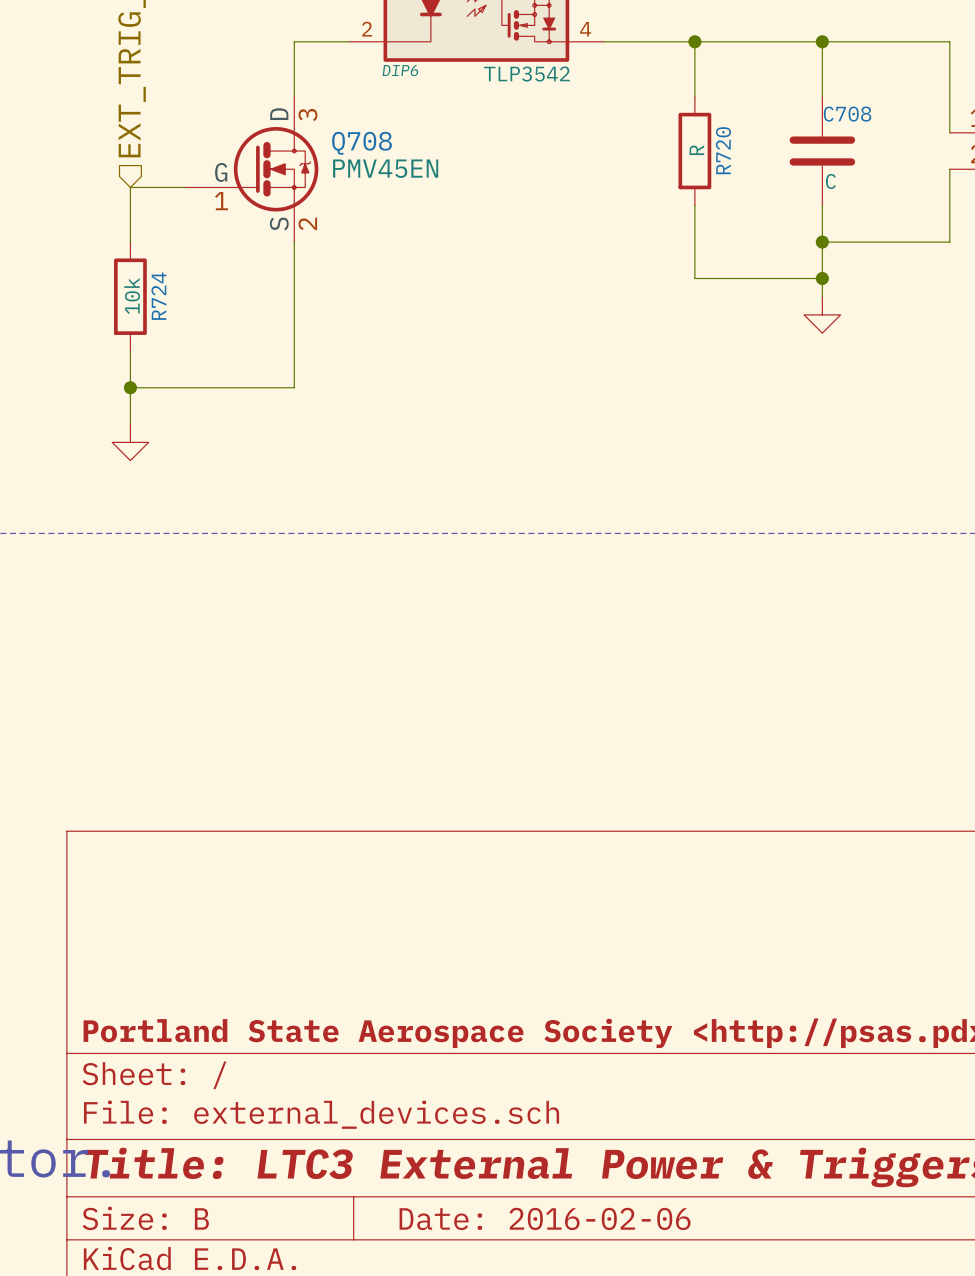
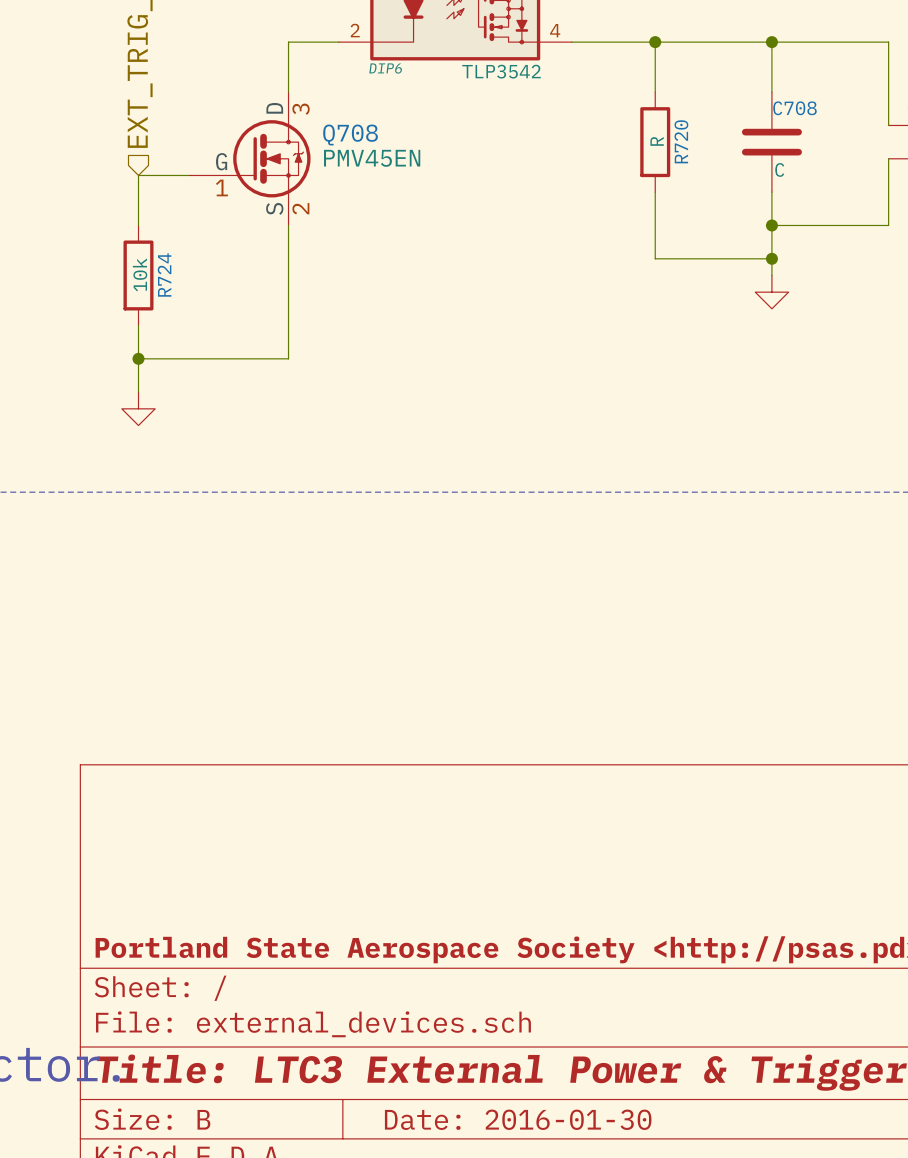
title block: Date: 2016-02-06 (545, 1218) -> Date: 2016-01-30 (518, 1119)

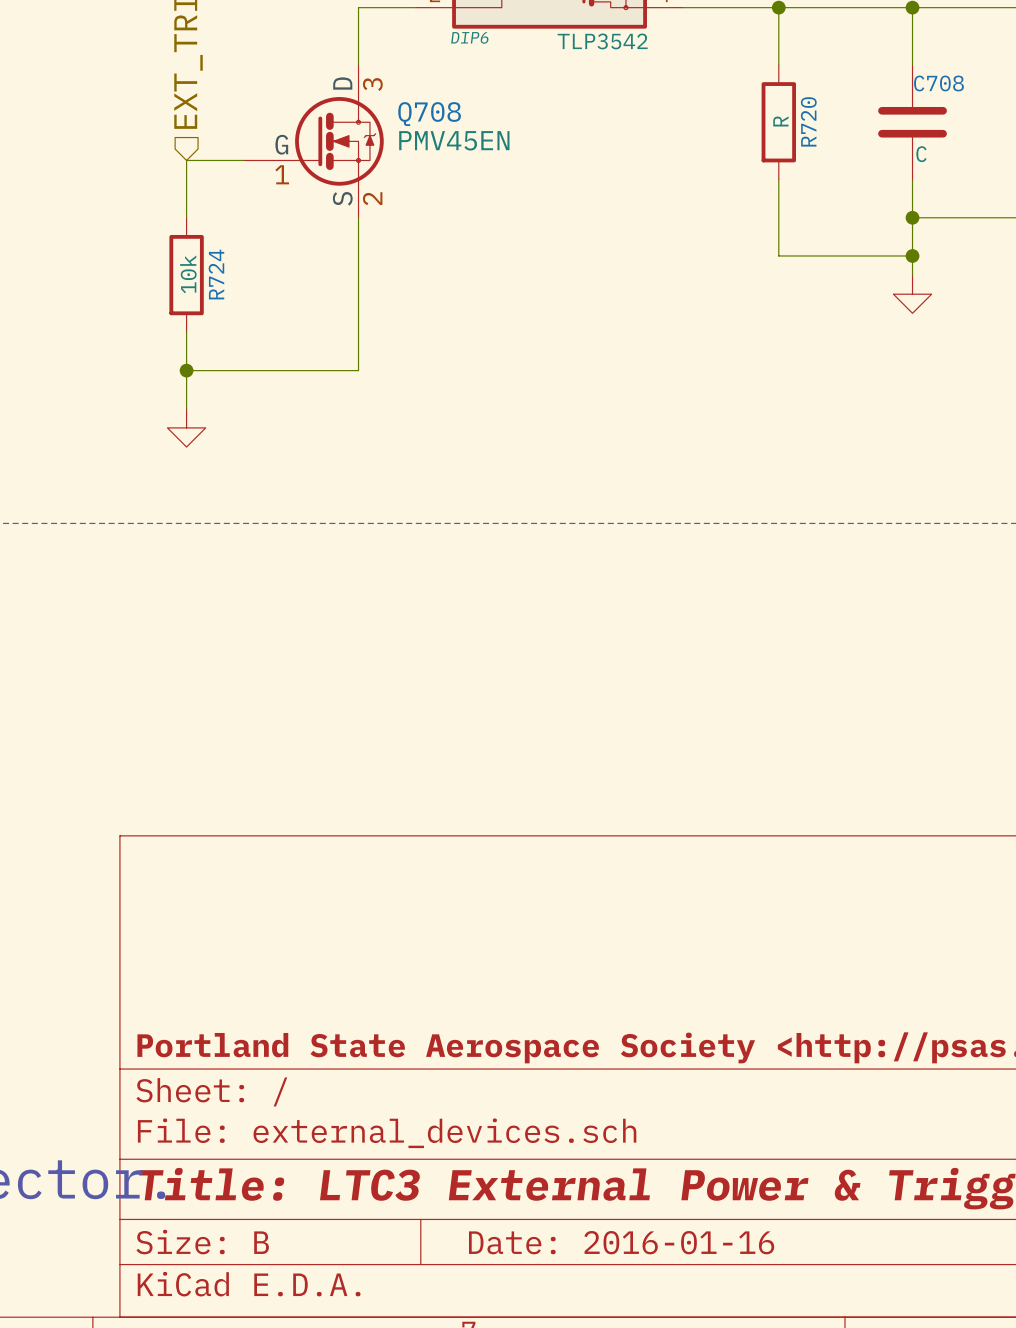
title block: Date: 2016-01-30 (518, 1119) -> Date: 2016-01-16 (621, 1242)

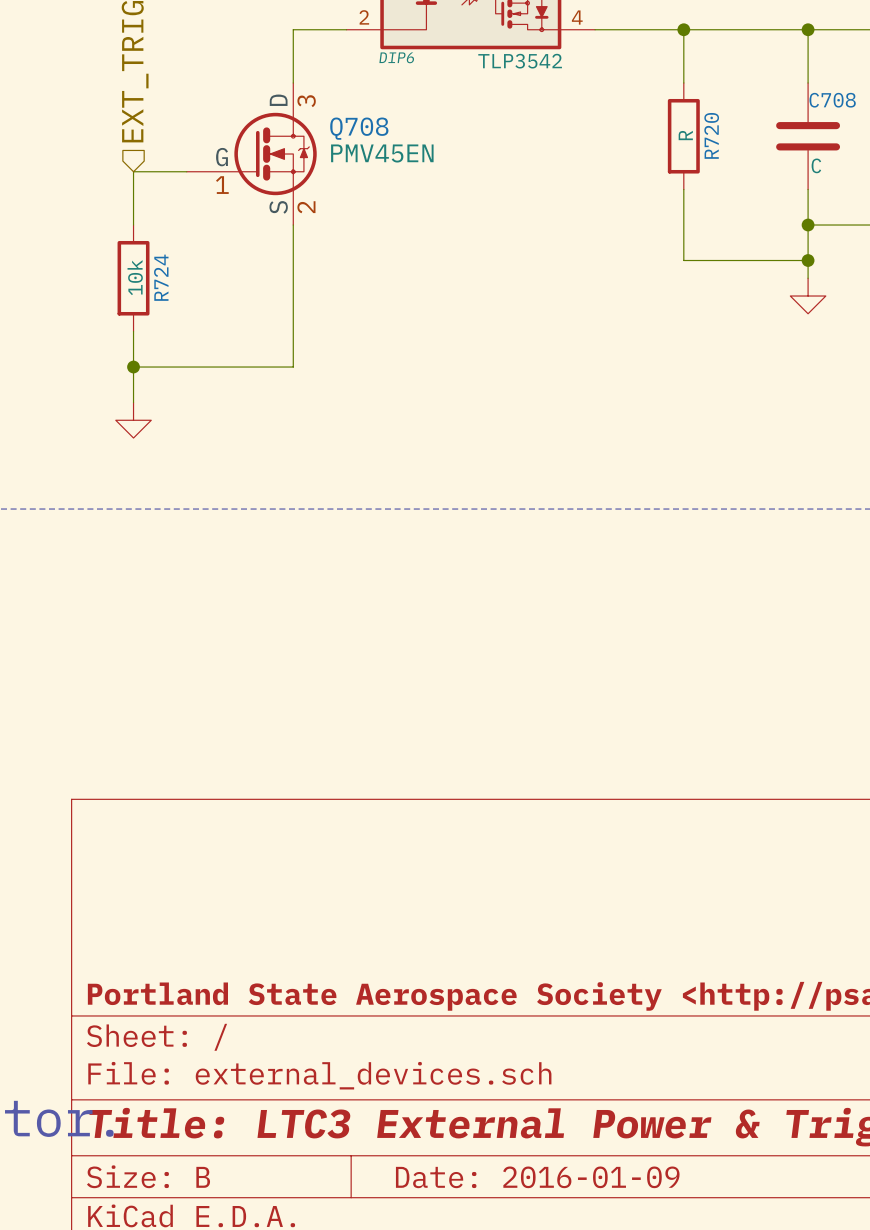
title block: Date: 2016-01-16 (621, 1242) -> Date: 2016-01-09 (537, 1177)

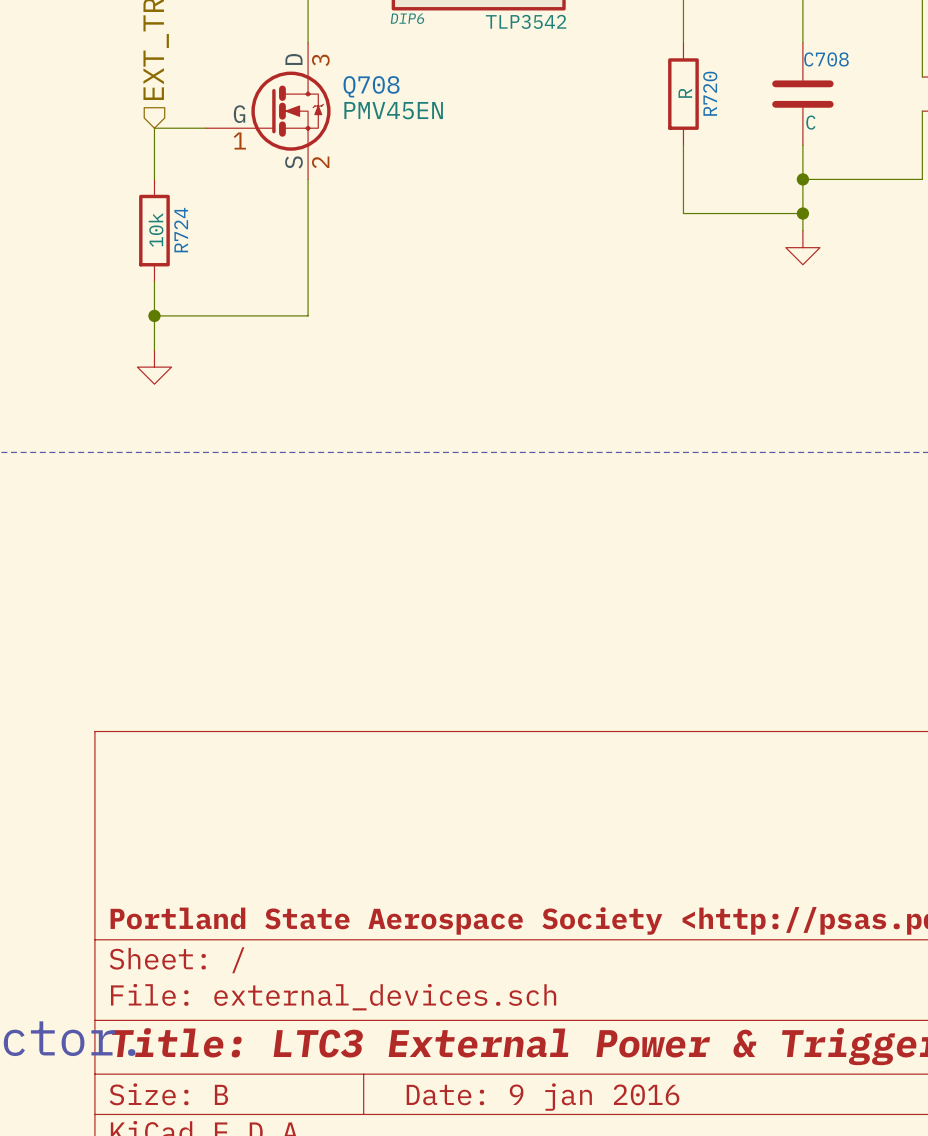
title block: Date: 2016-01-09 (537, 1177) -> Date: 9 jan 2016 (543, 1097)

